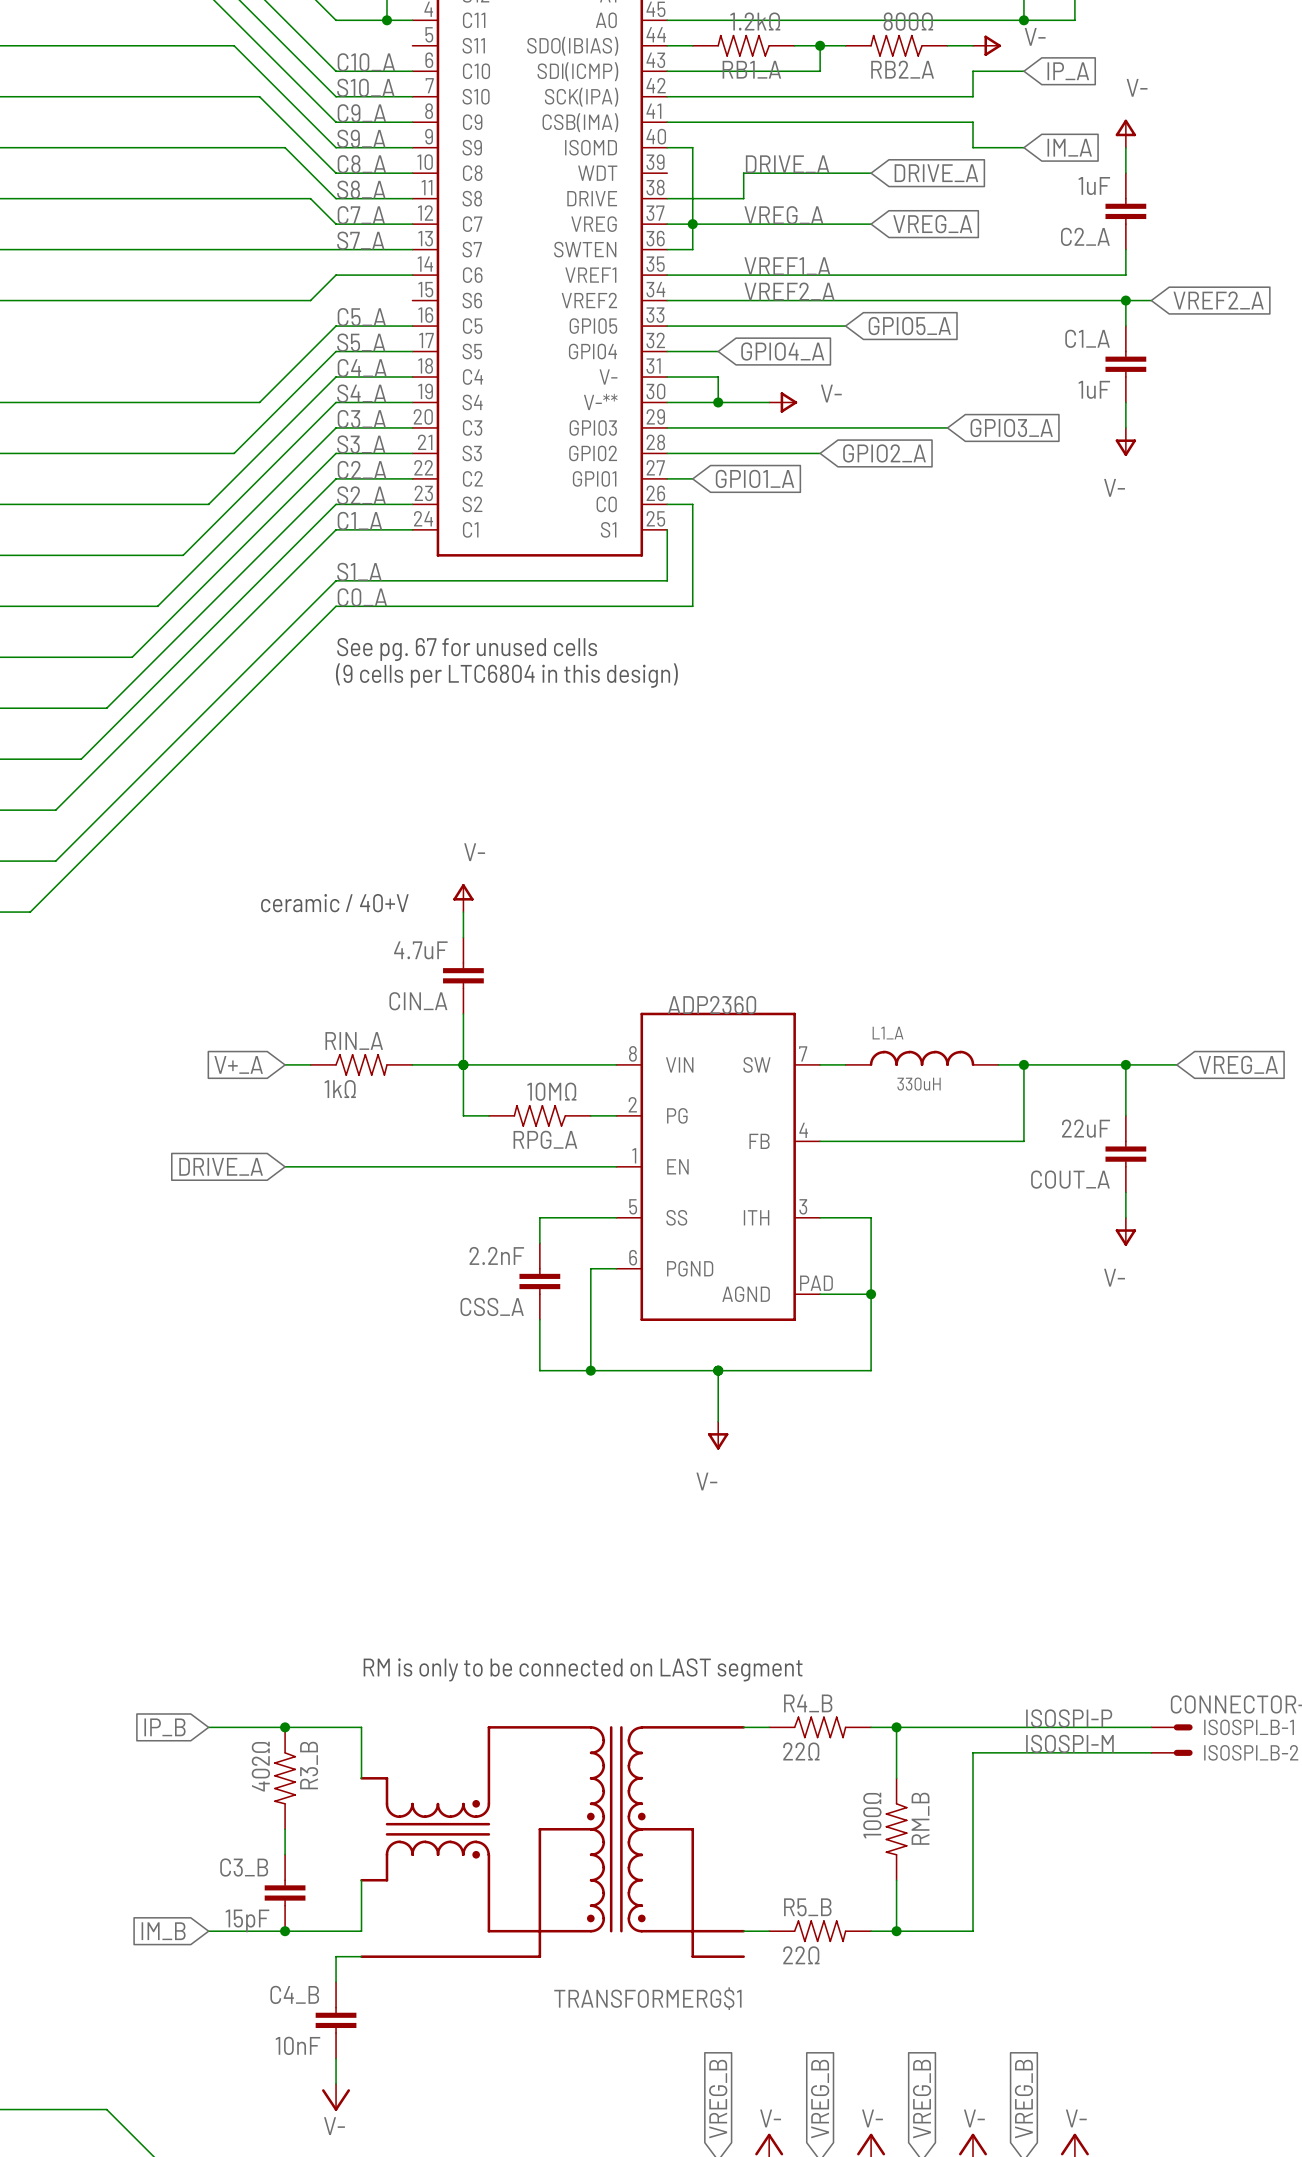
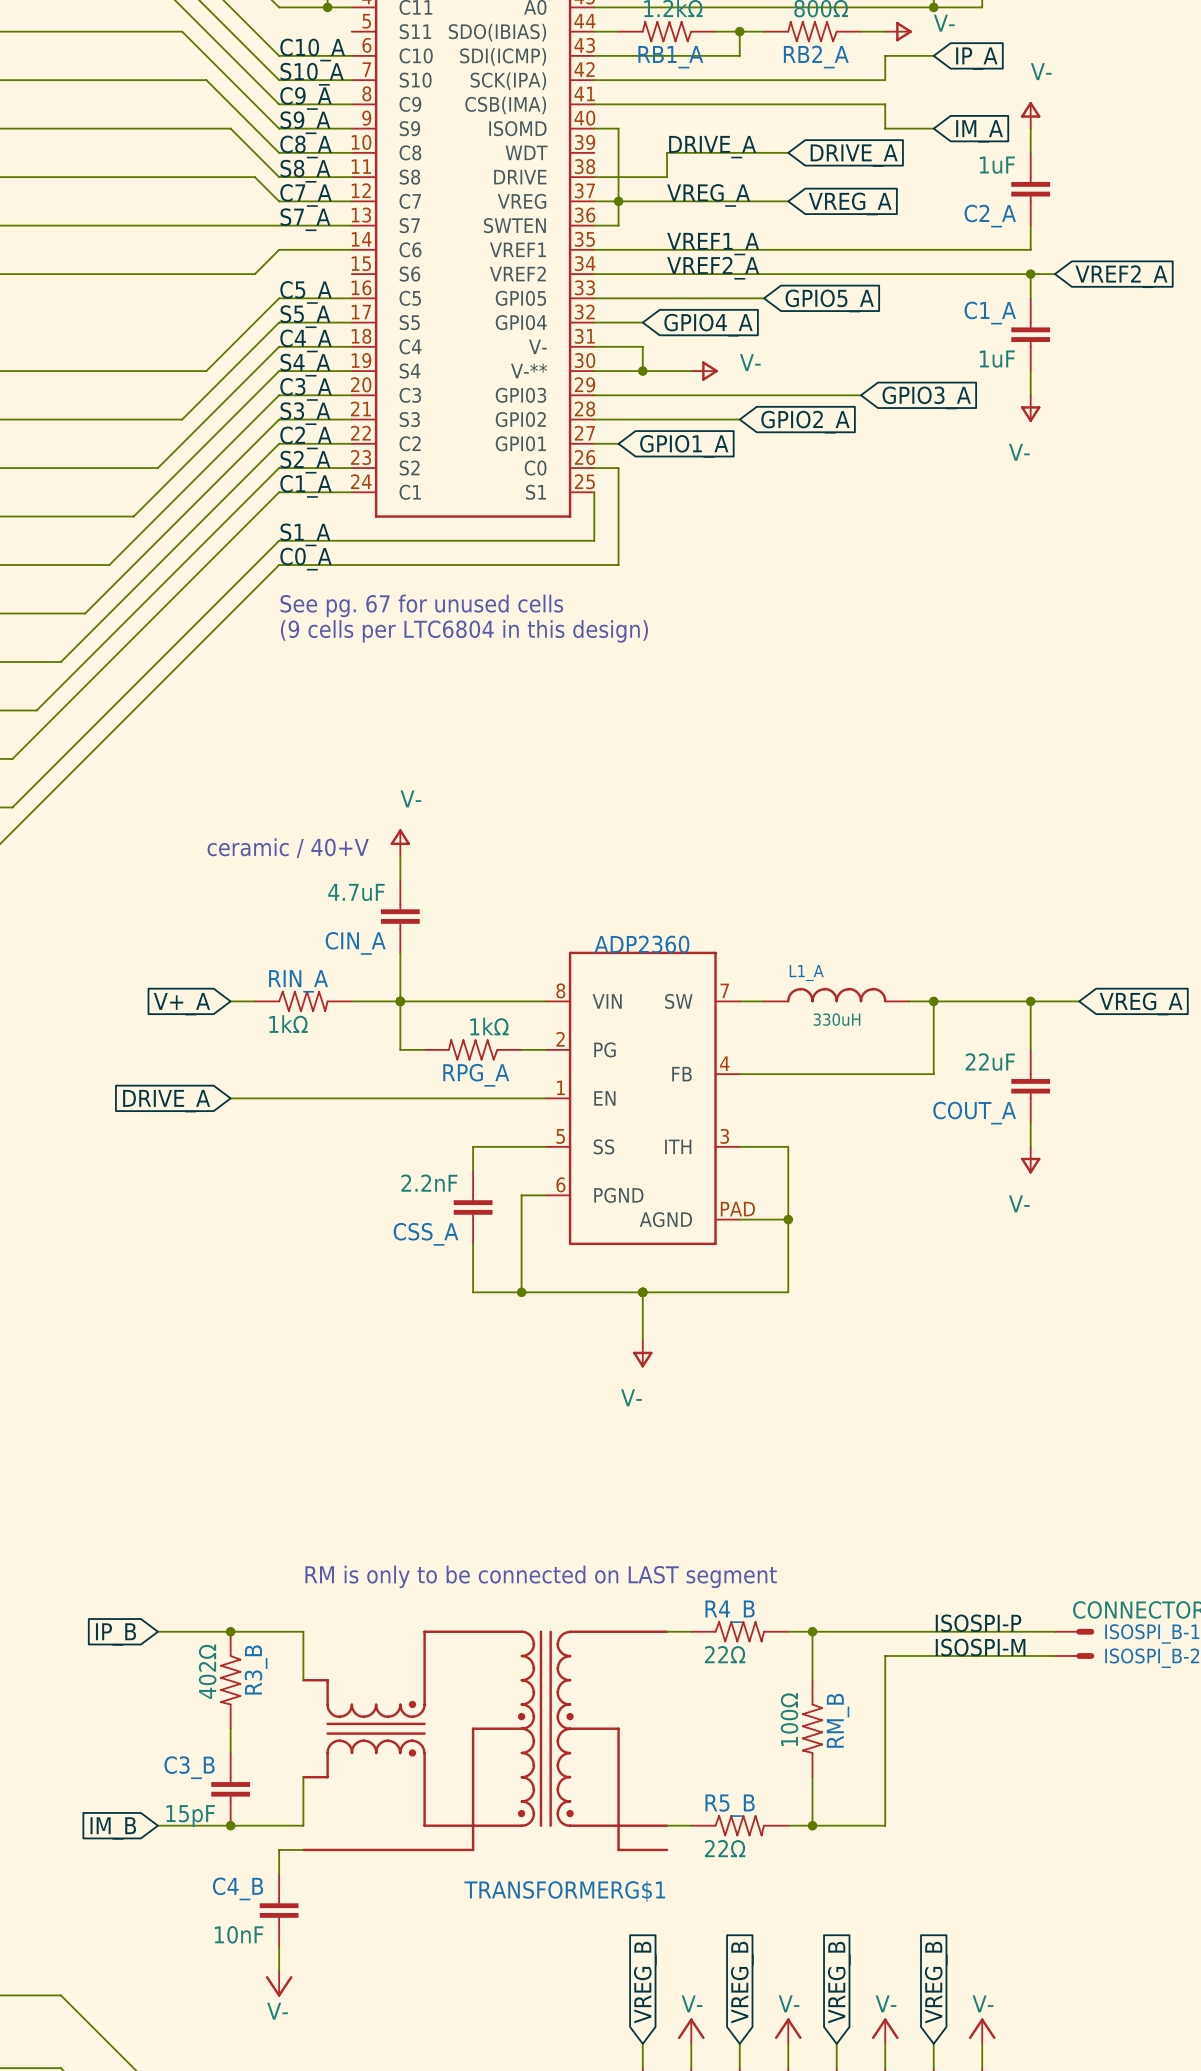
RPG_A value: 10MΩ (551, 1091) -> 1kΩ (489, 1026)

